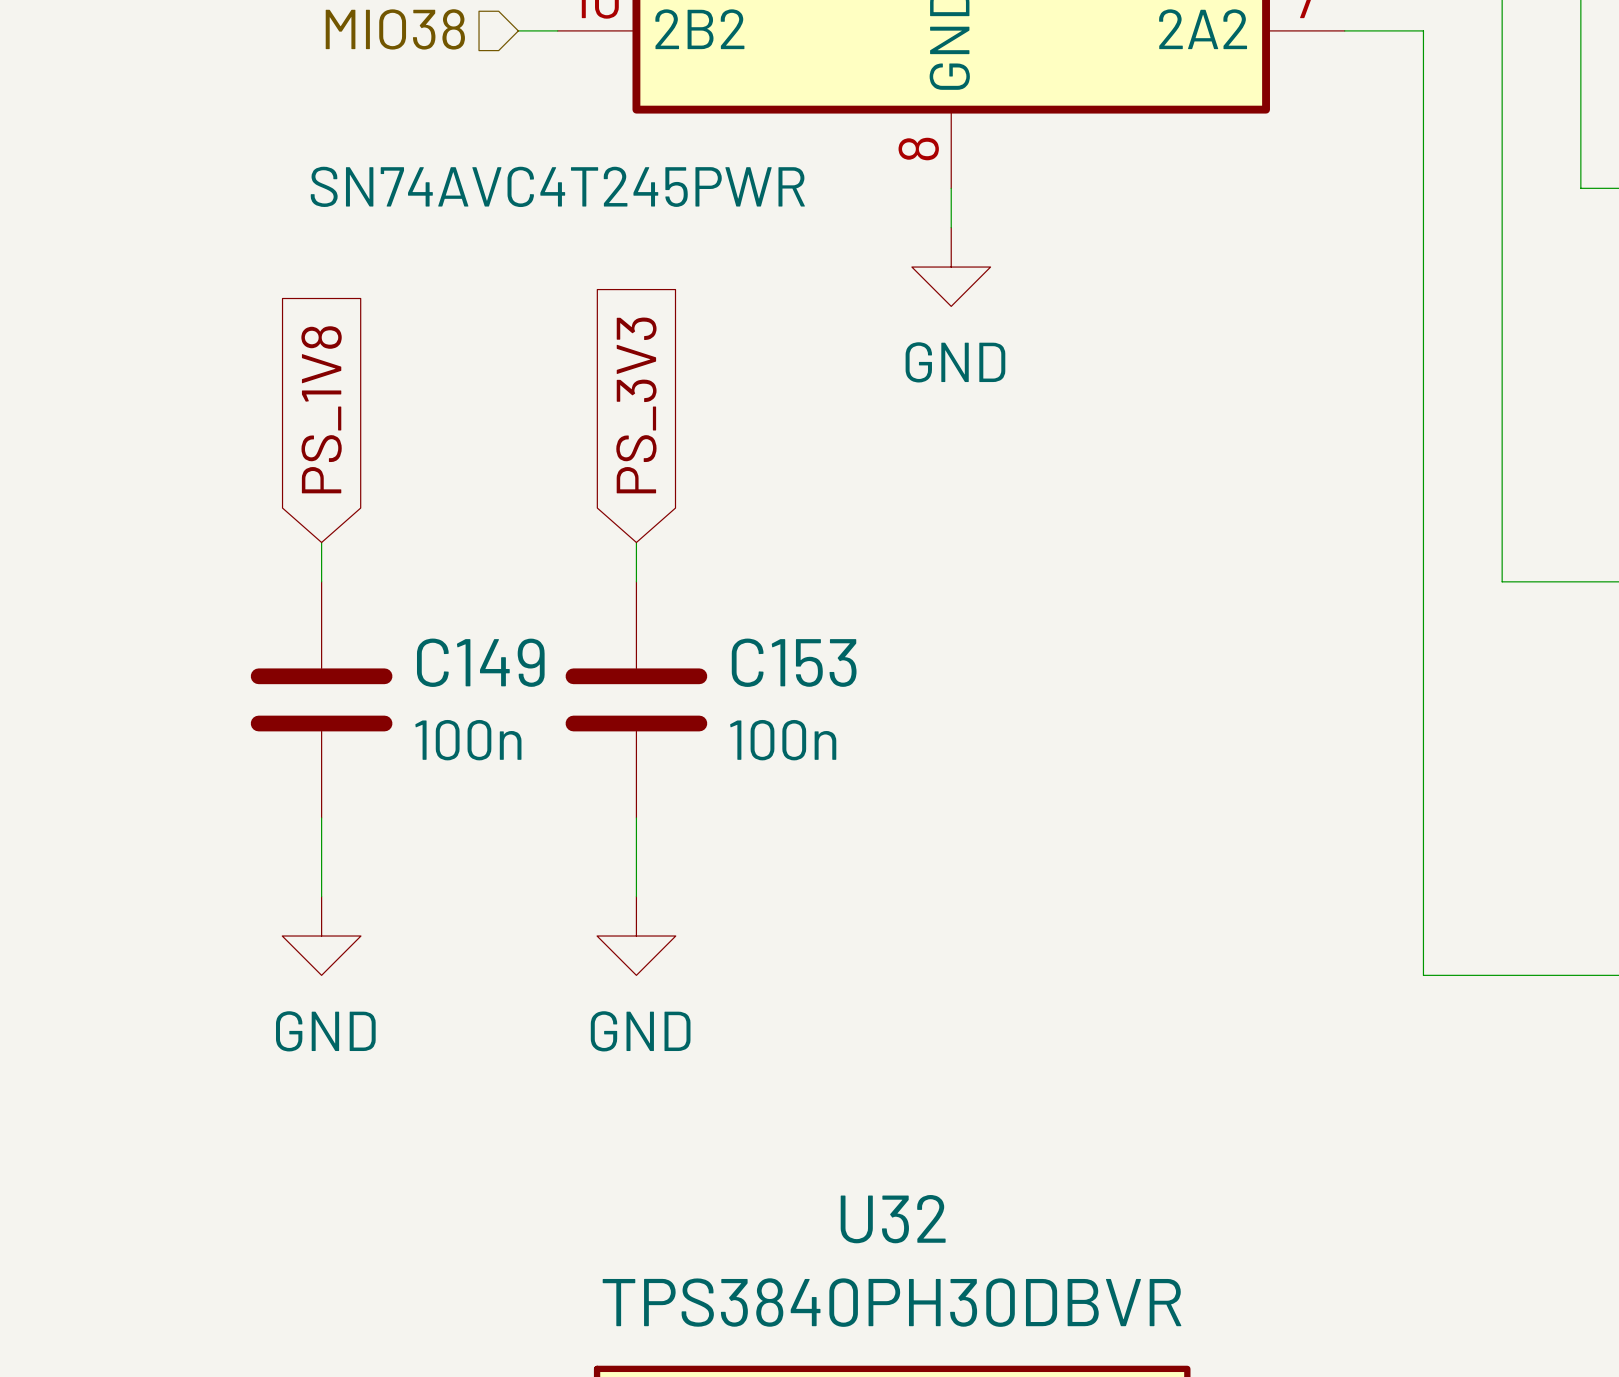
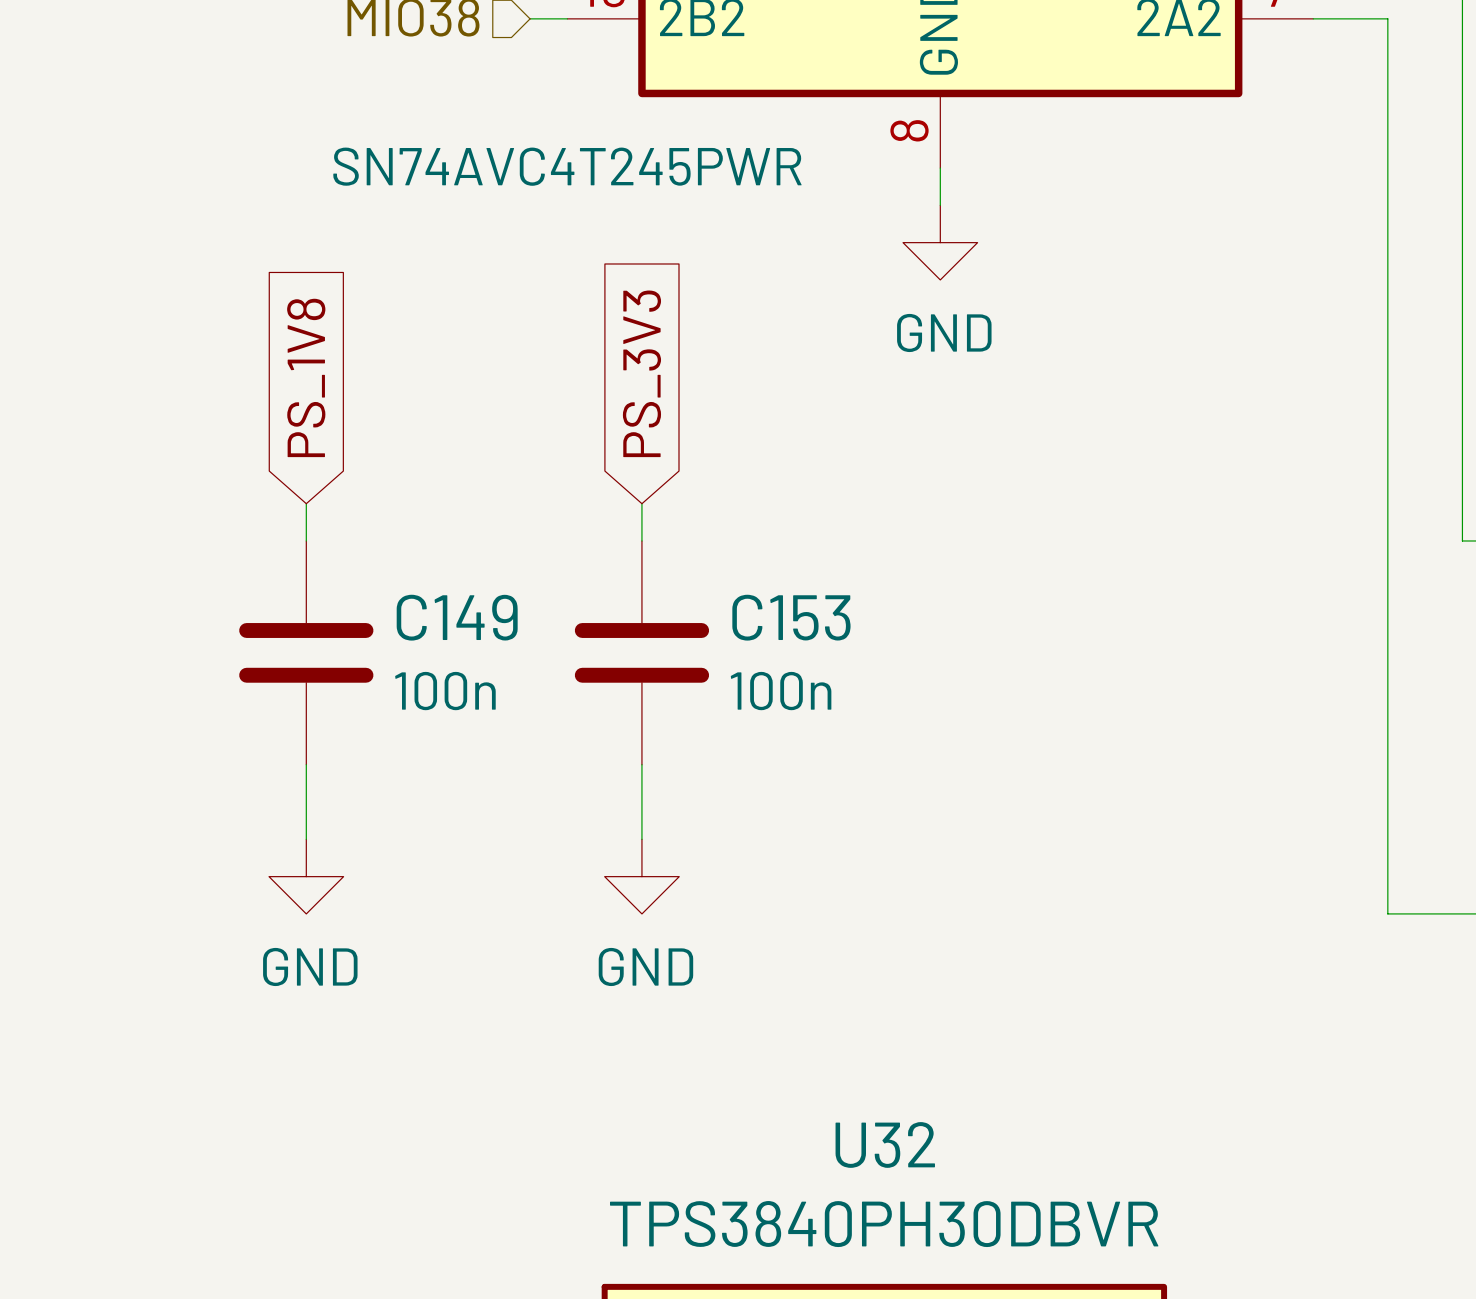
global label position: PS_1V8 (321, 409) -> PS_1V8 (306, 377)
wire: (321, 542) (321, 581) -> (306, 503) (306, 540)
C149 position: (321, 699) -> (306, 652)
wire: (321, 817) (321, 896) -> (306, 764) (306, 839)
power symbol position: GND (321, 936) -> GND (306, 876)

